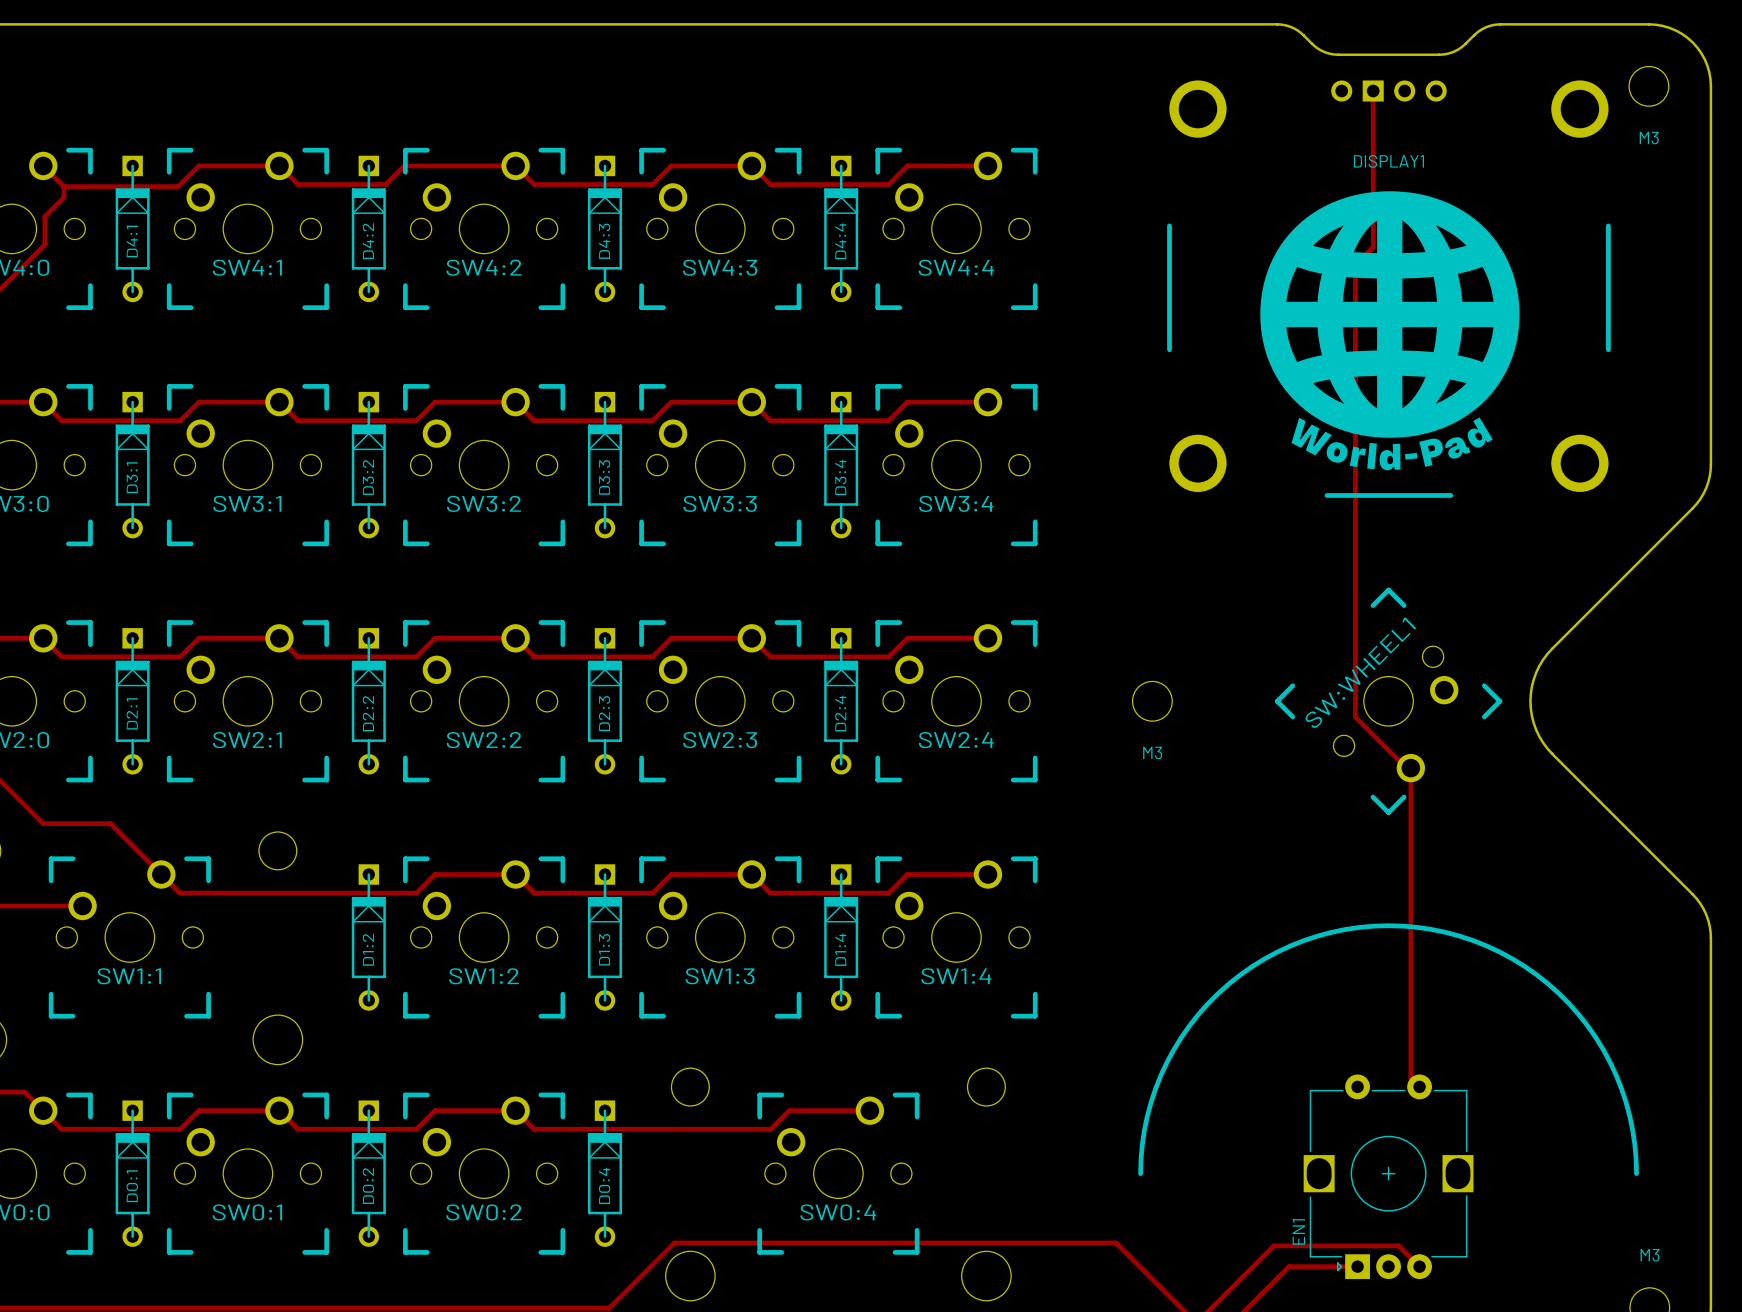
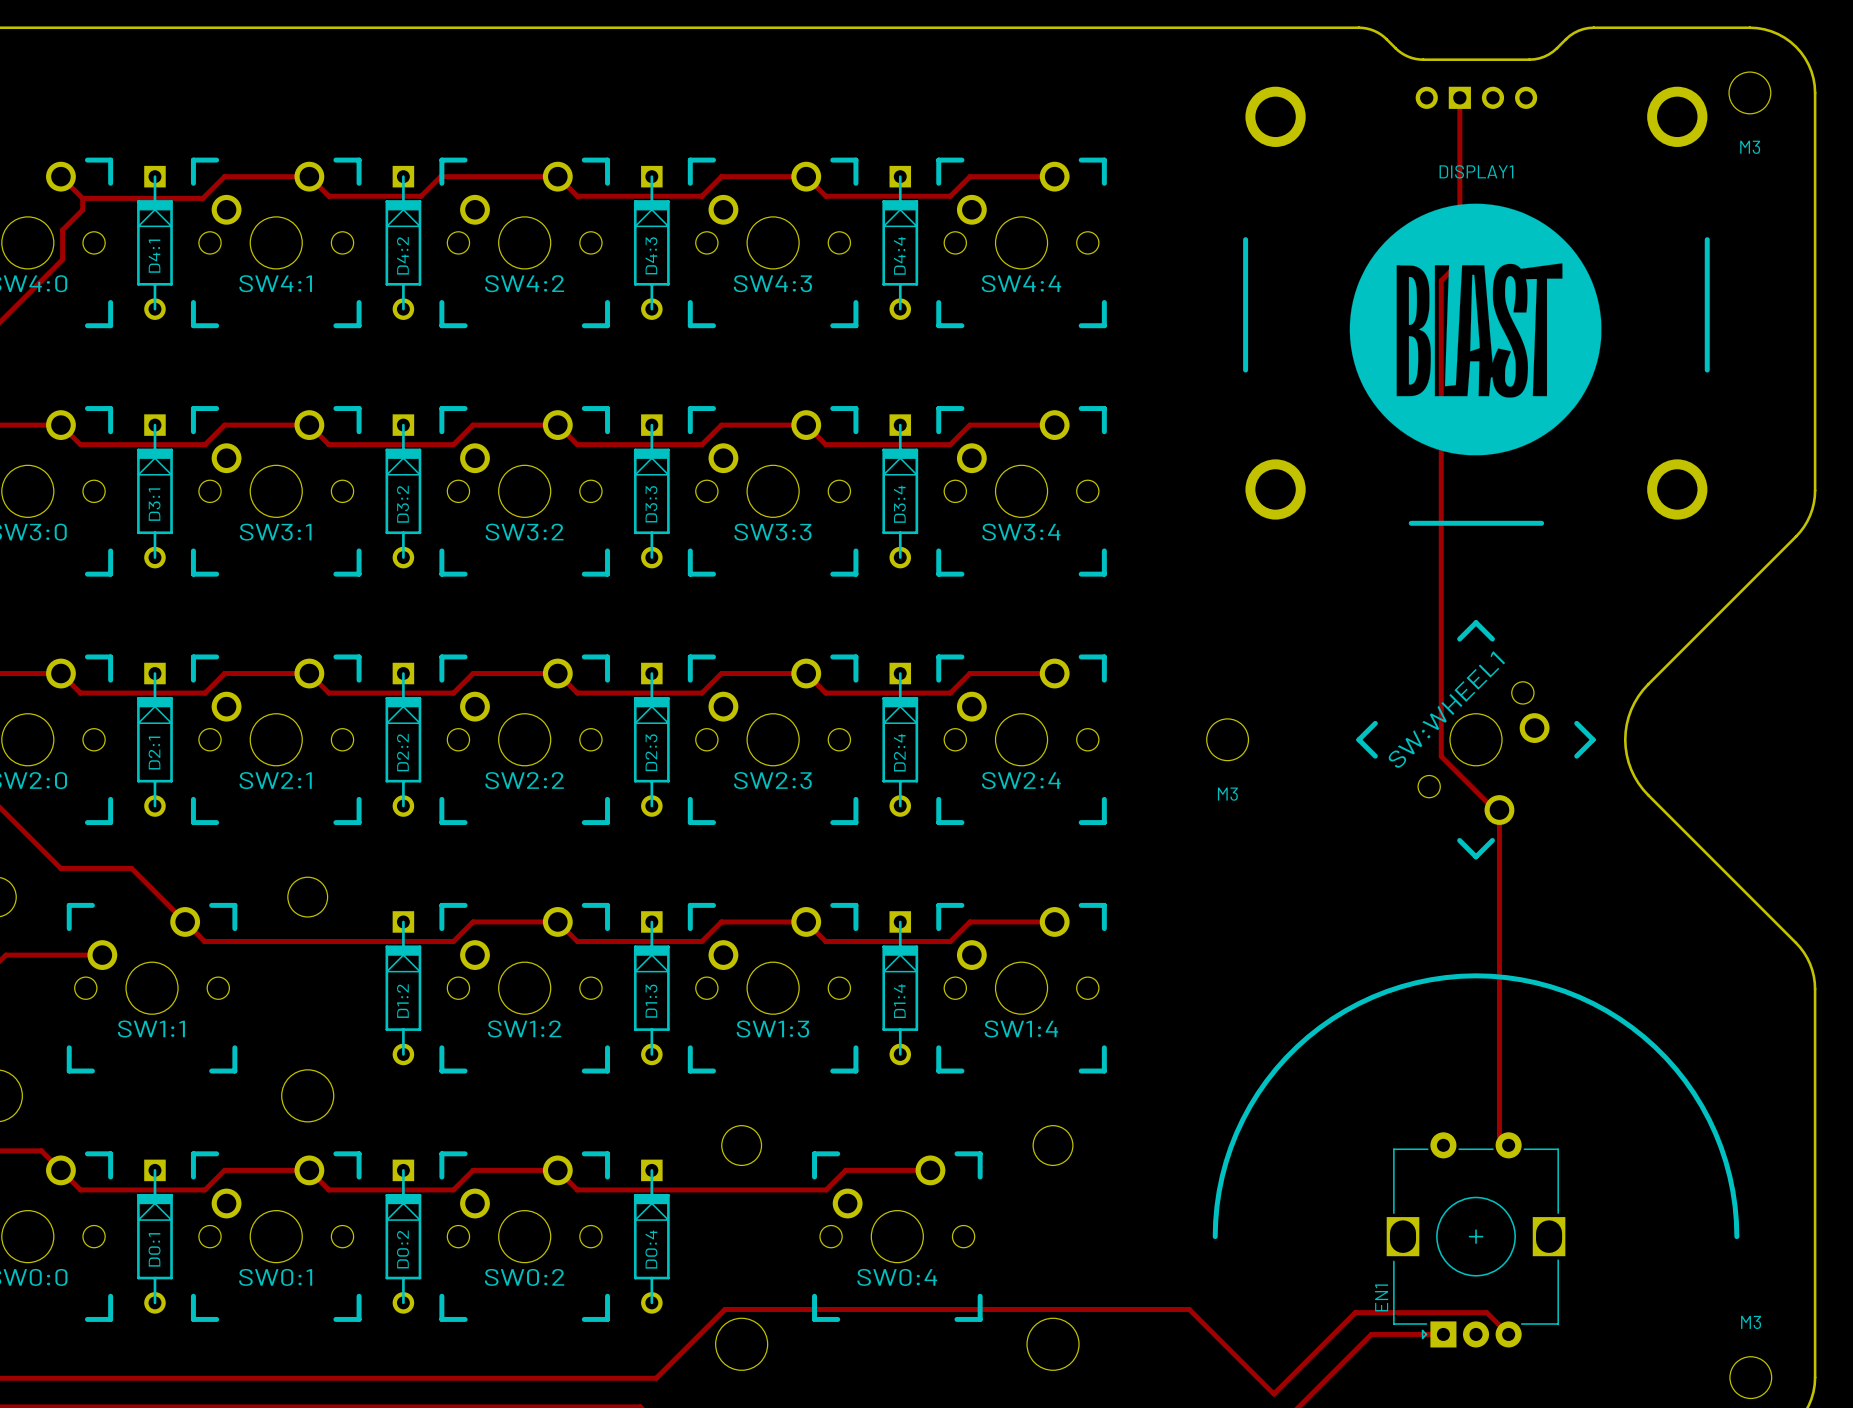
drawing shape: [1260, 191, 1520, 438] -> [1349, 203, 1602, 456]
drawing: [1291, 417, 1493, 471] -> none

